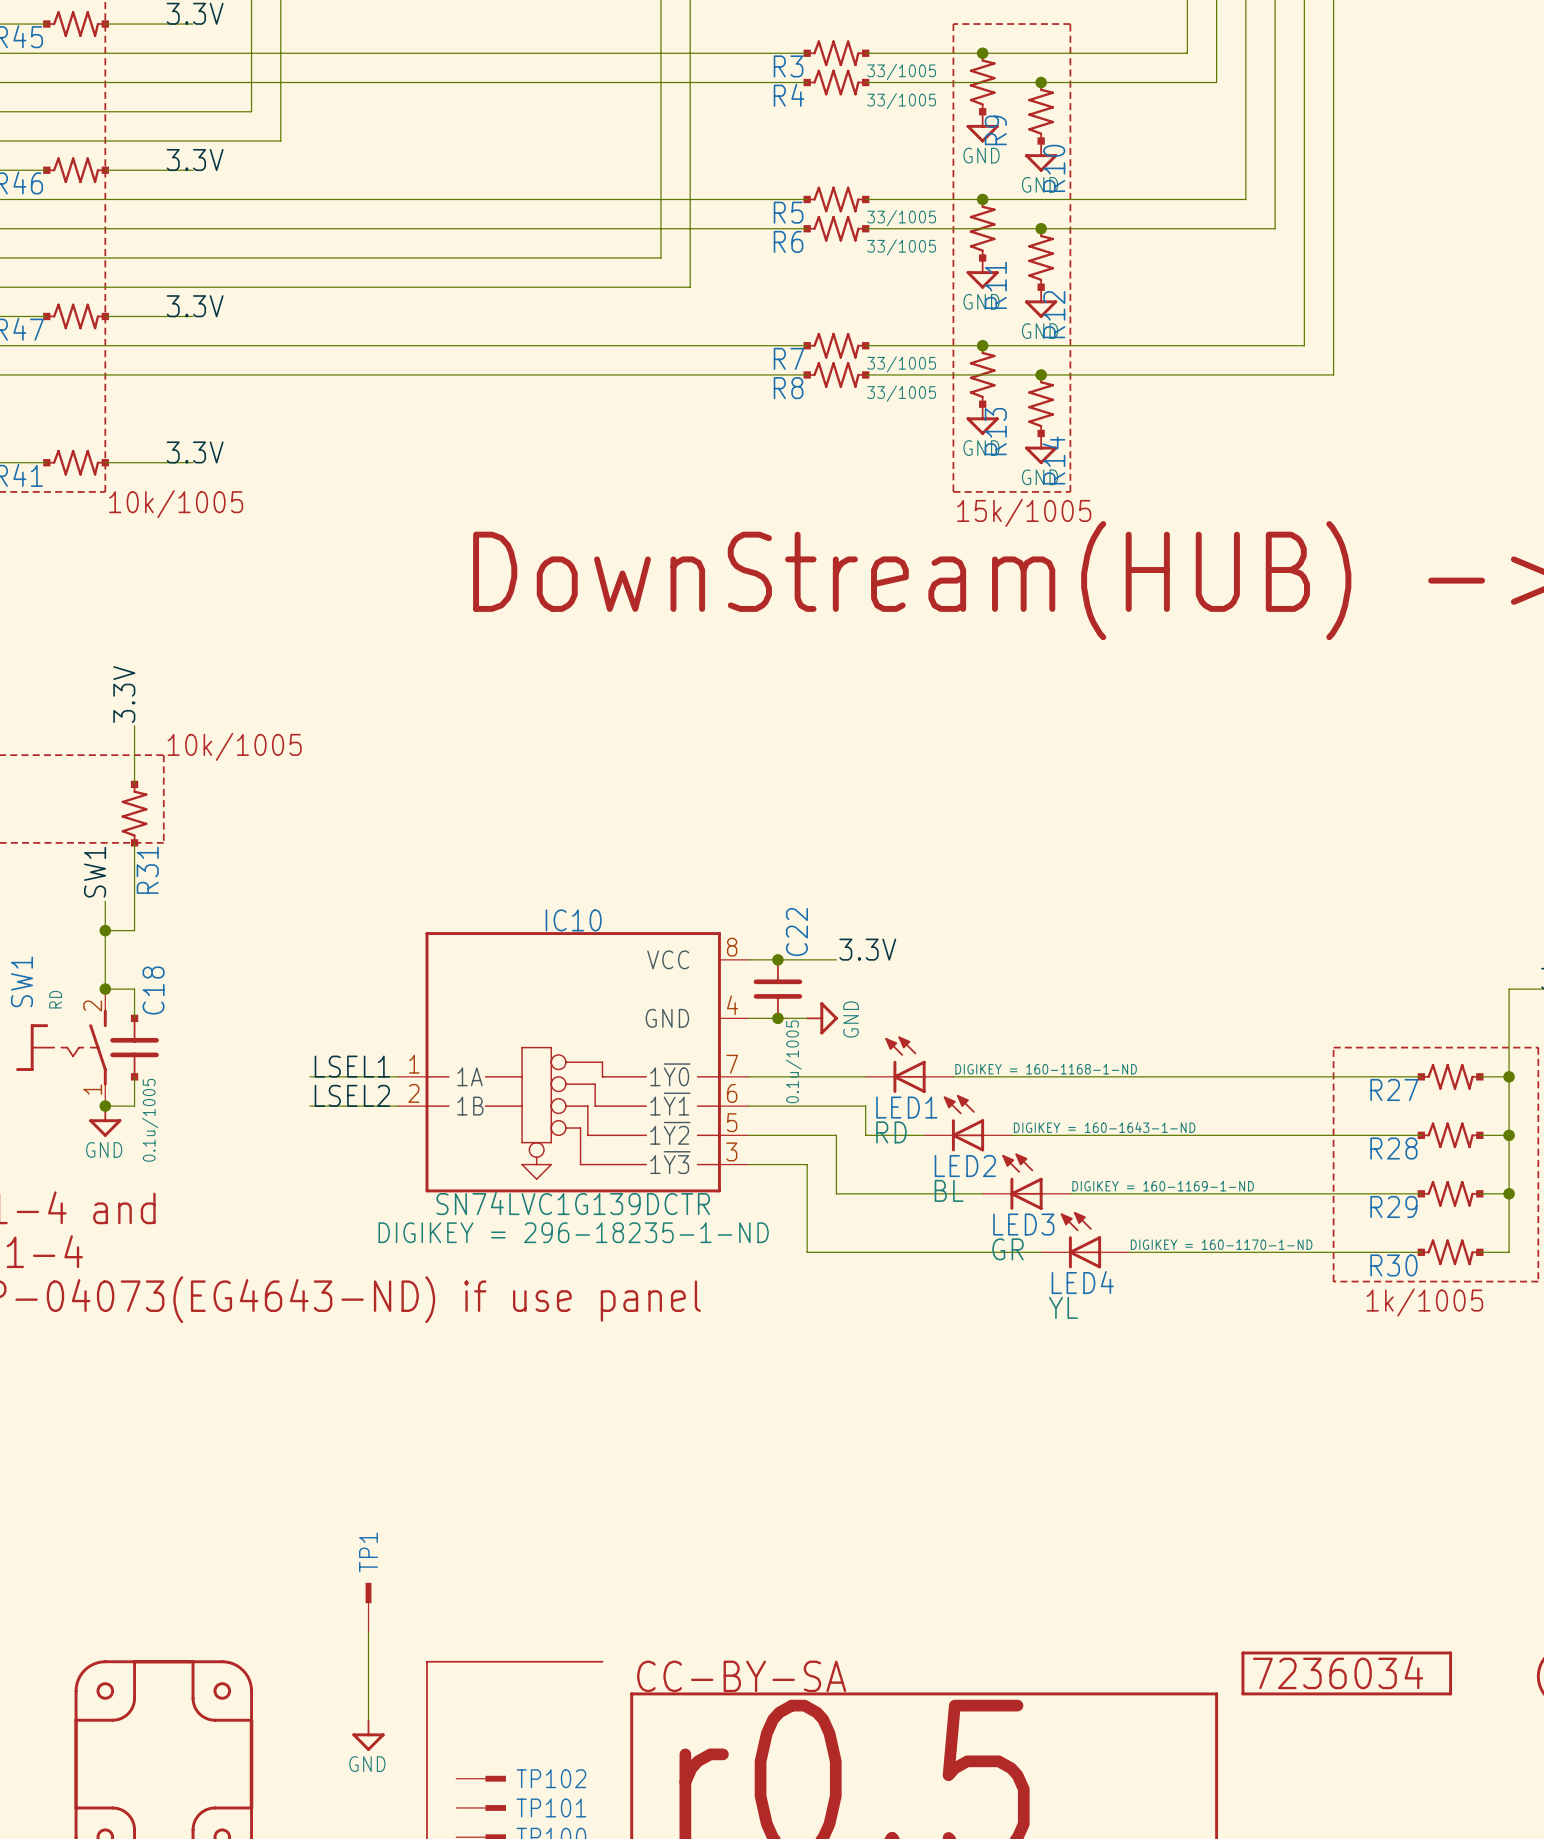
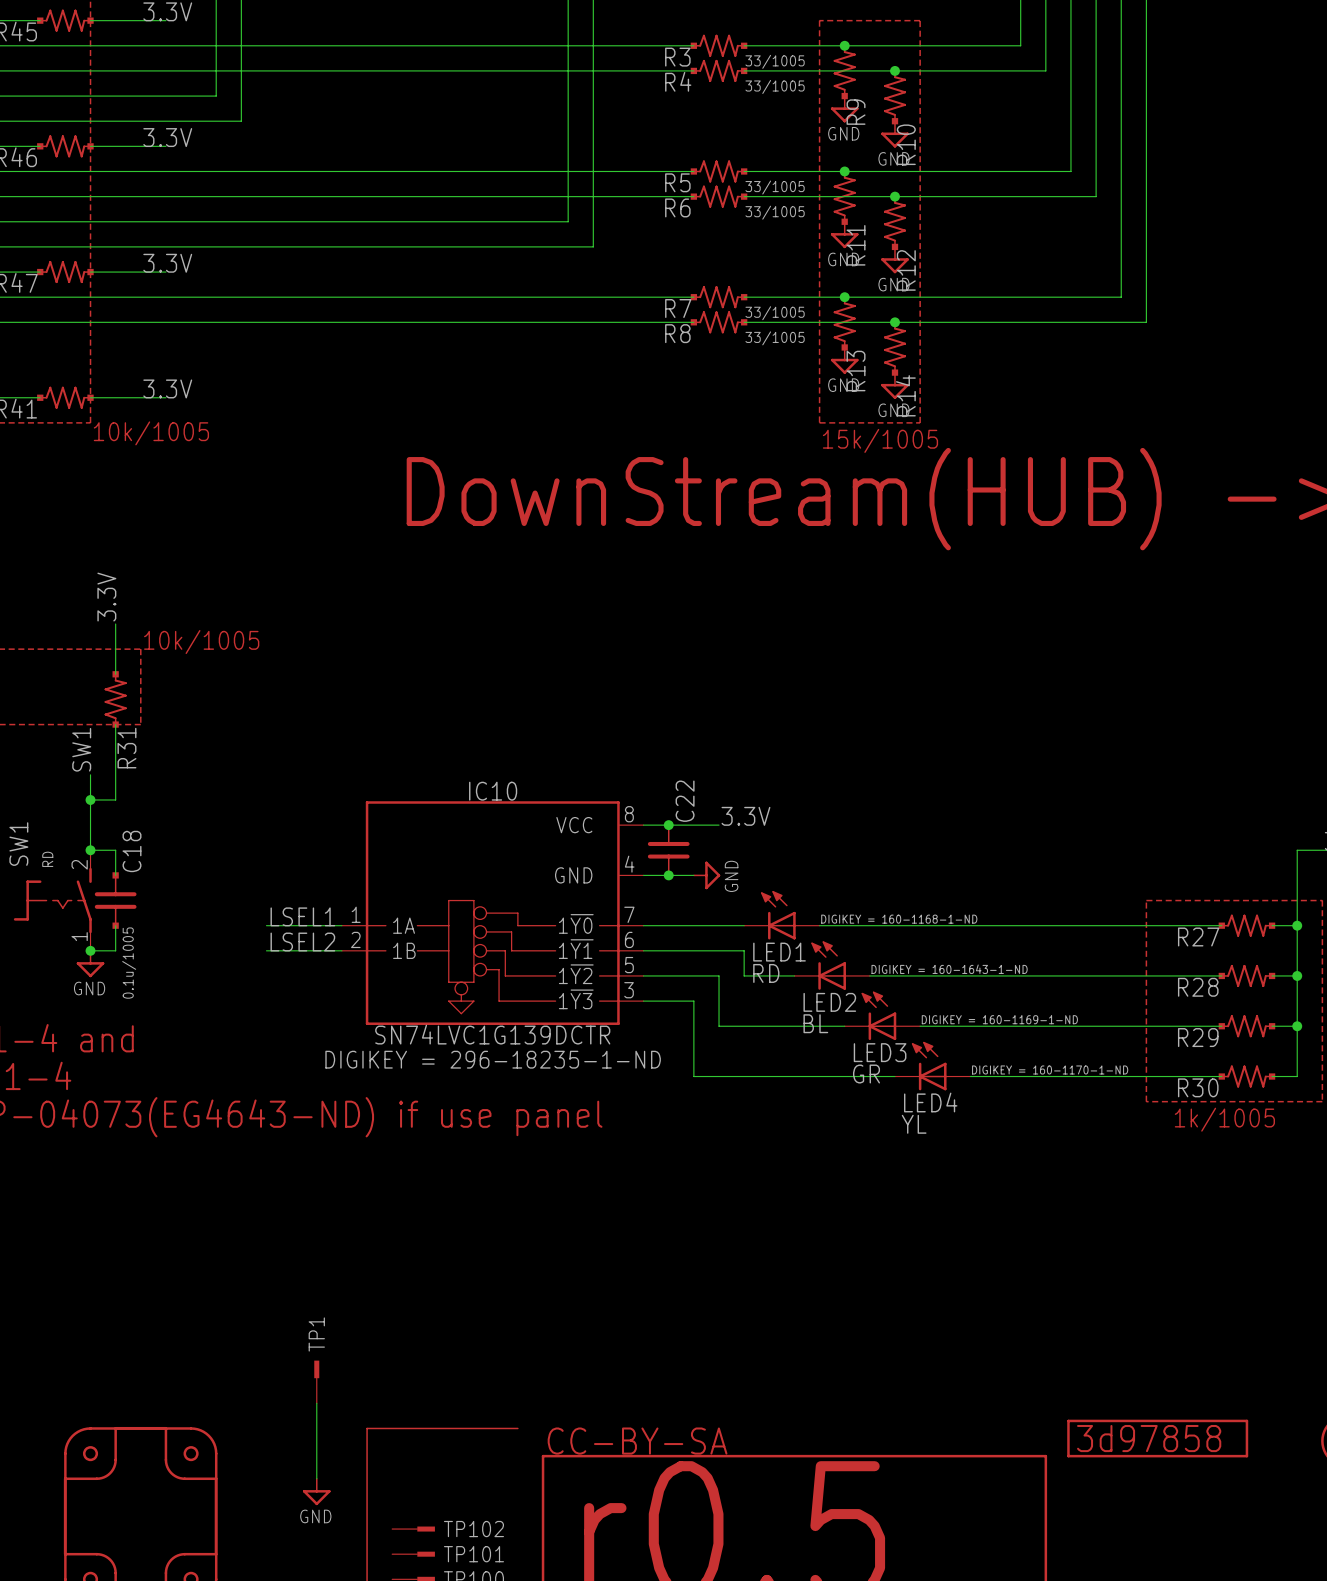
C22 value: 0.1u/1005 (793, 1061) -> none
part value: 7236034 (1338, 1672) -> 3d97858 (1149, 1438)

